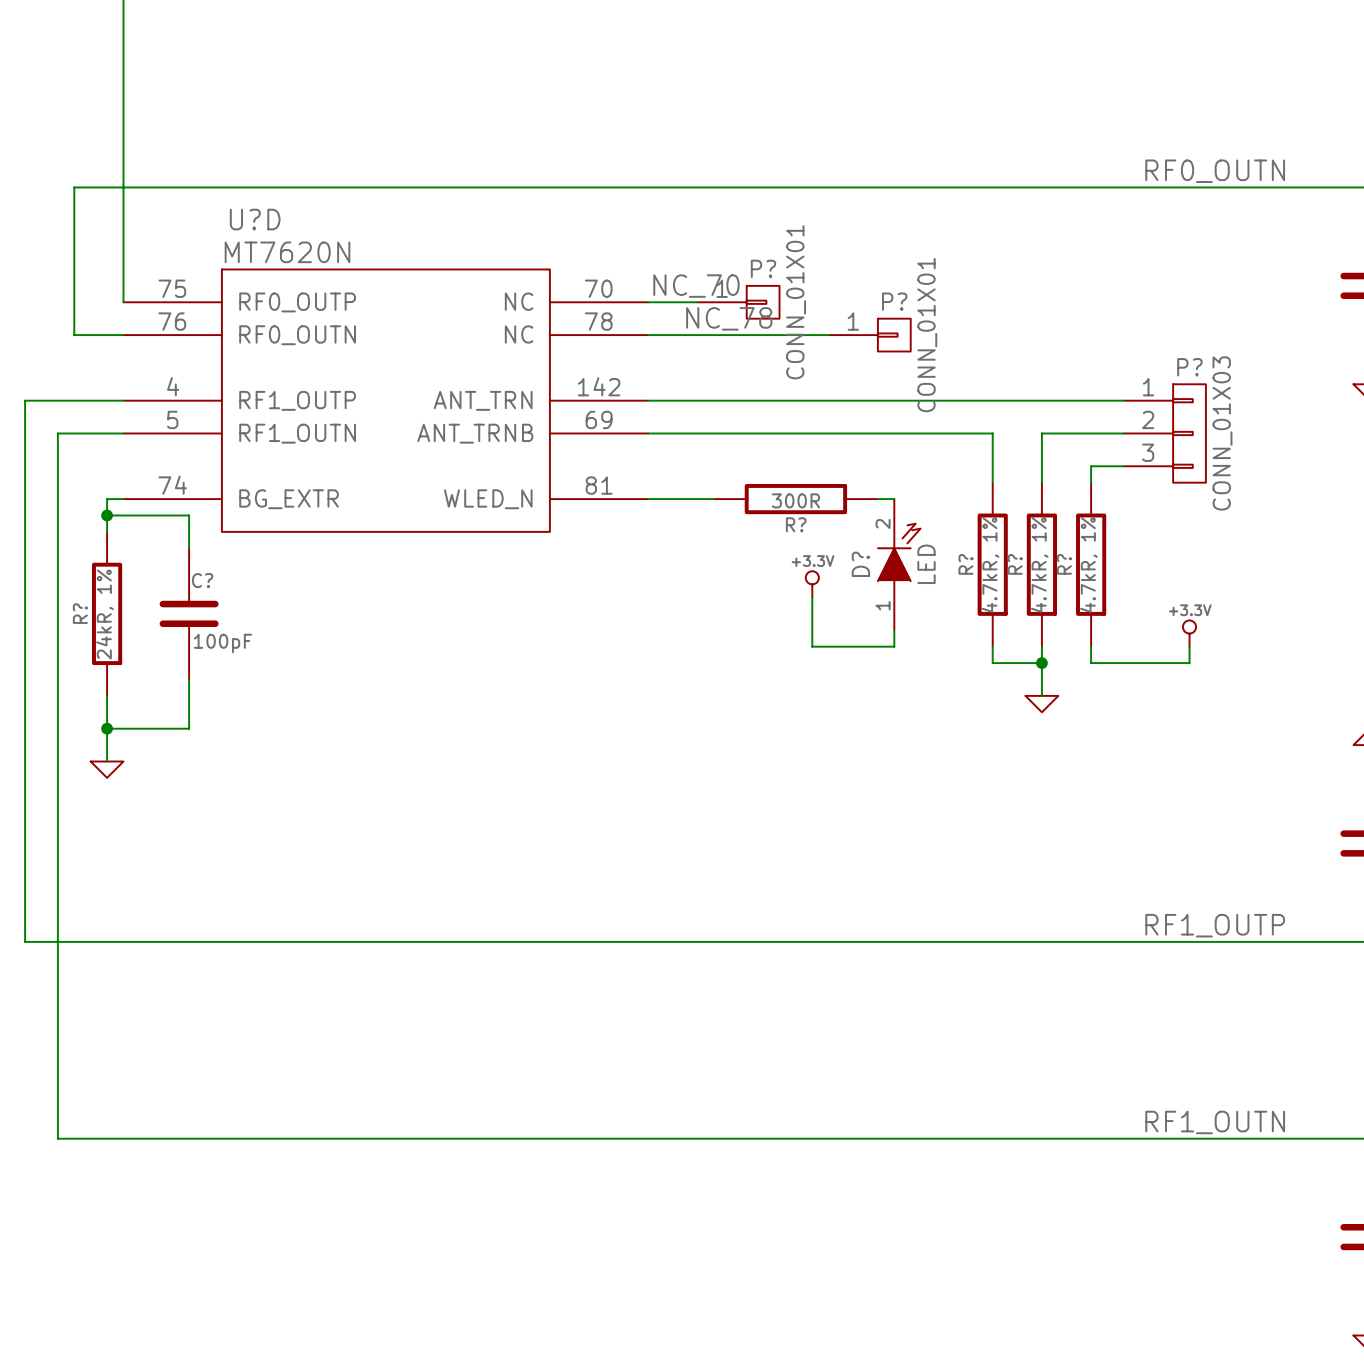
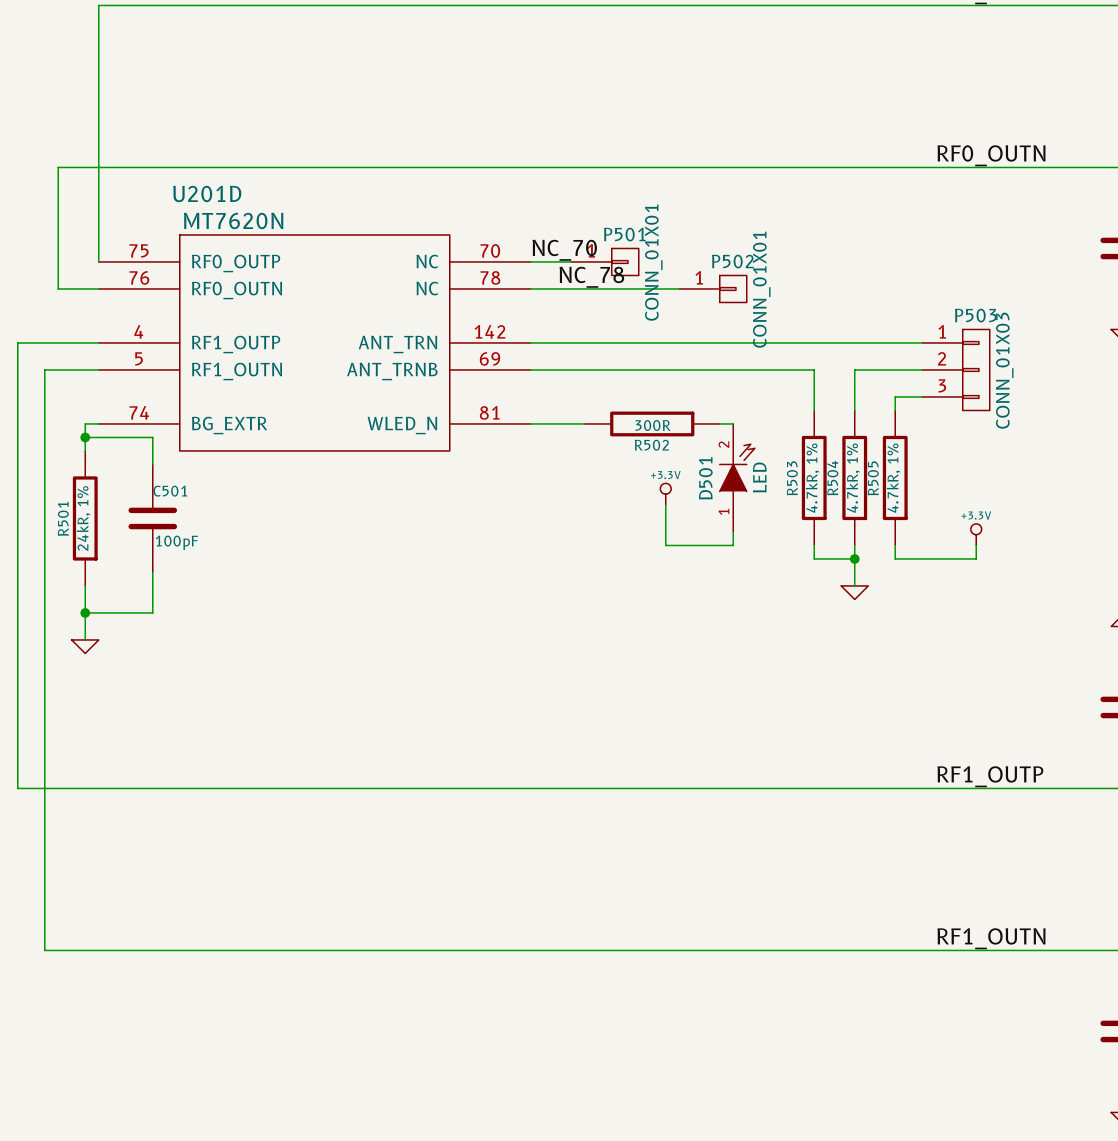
U?D name: U?D (255, 219) -> U201D (207, 193)
P? name: P? (763, 268) -> P501 (624, 234)
P? name: P? (894, 301) -> P502 (732, 261)
P? name: P? (1189, 367) -> P503 (975, 315)
R? name: R? (796, 524) -> R502 (651, 445)
D? name: D? (860, 564) -> D501 (705, 478)
R? name: R? (965, 564) -> R503 (792, 478)
R? name: R? (1015, 564) -> R504 (832, 478)
R? name: R? (1064, 564) -> R505 (873, 478)
C? name: C? (202, 580) -> C501 (170, 491)
R? name: R? (80, 613) -> R501 (63, 518)

